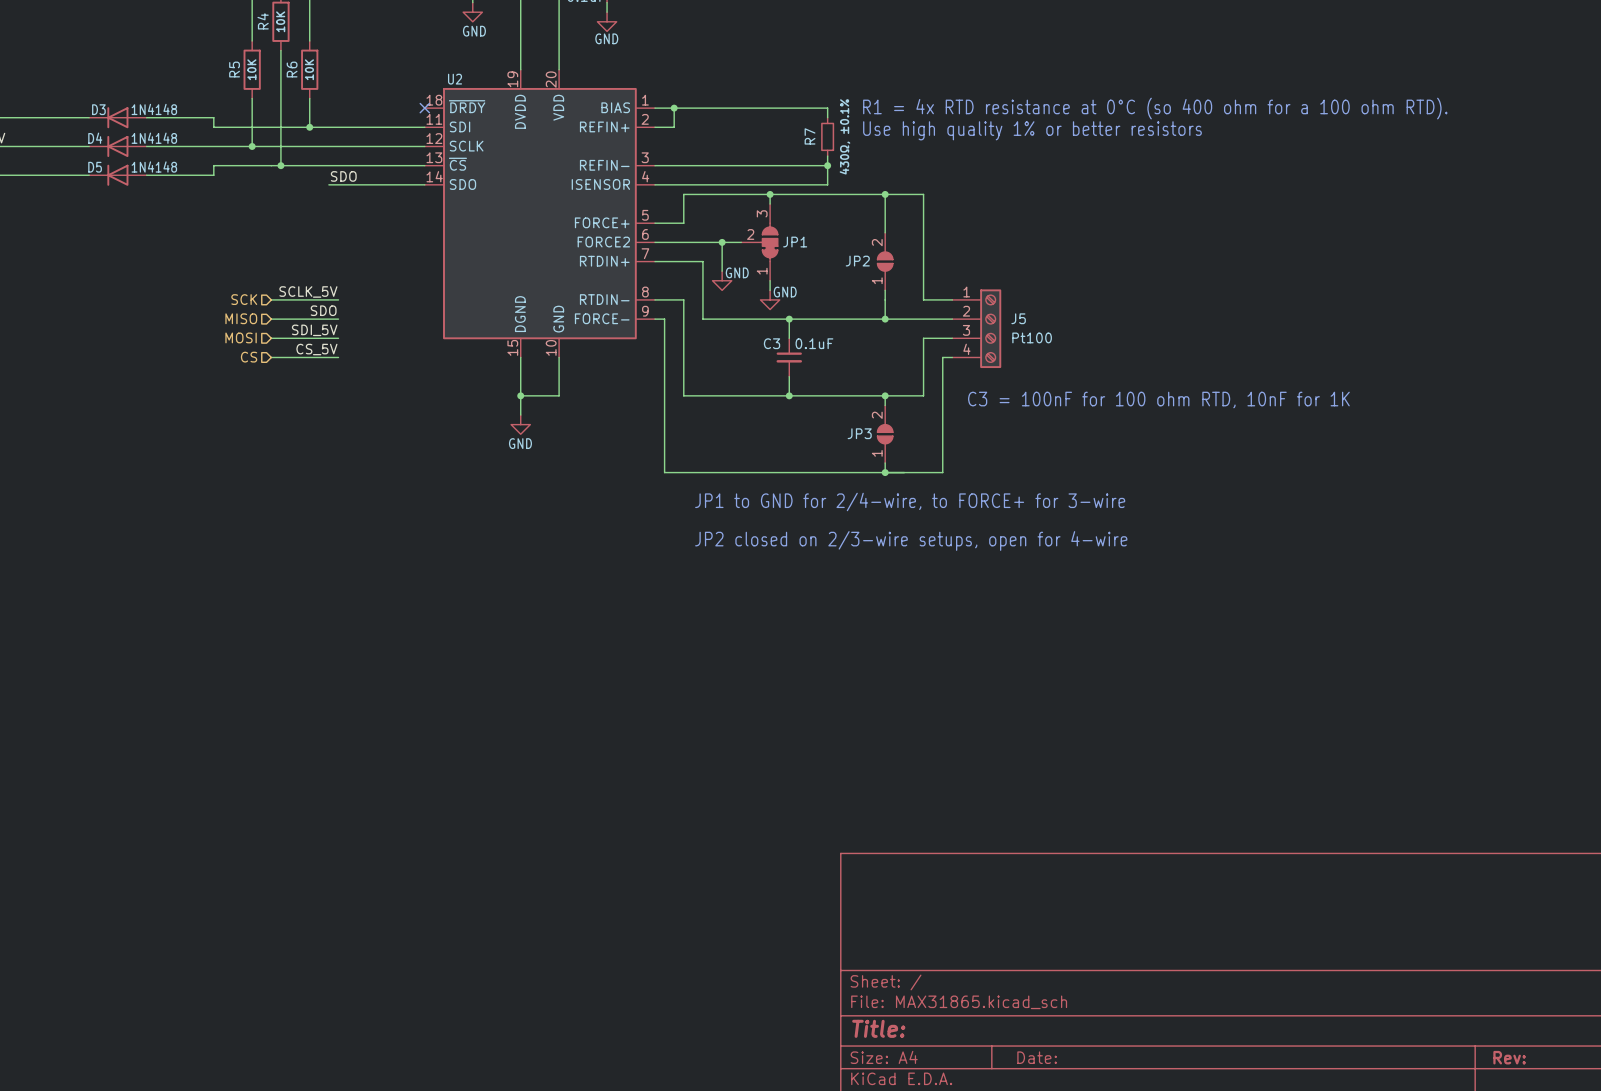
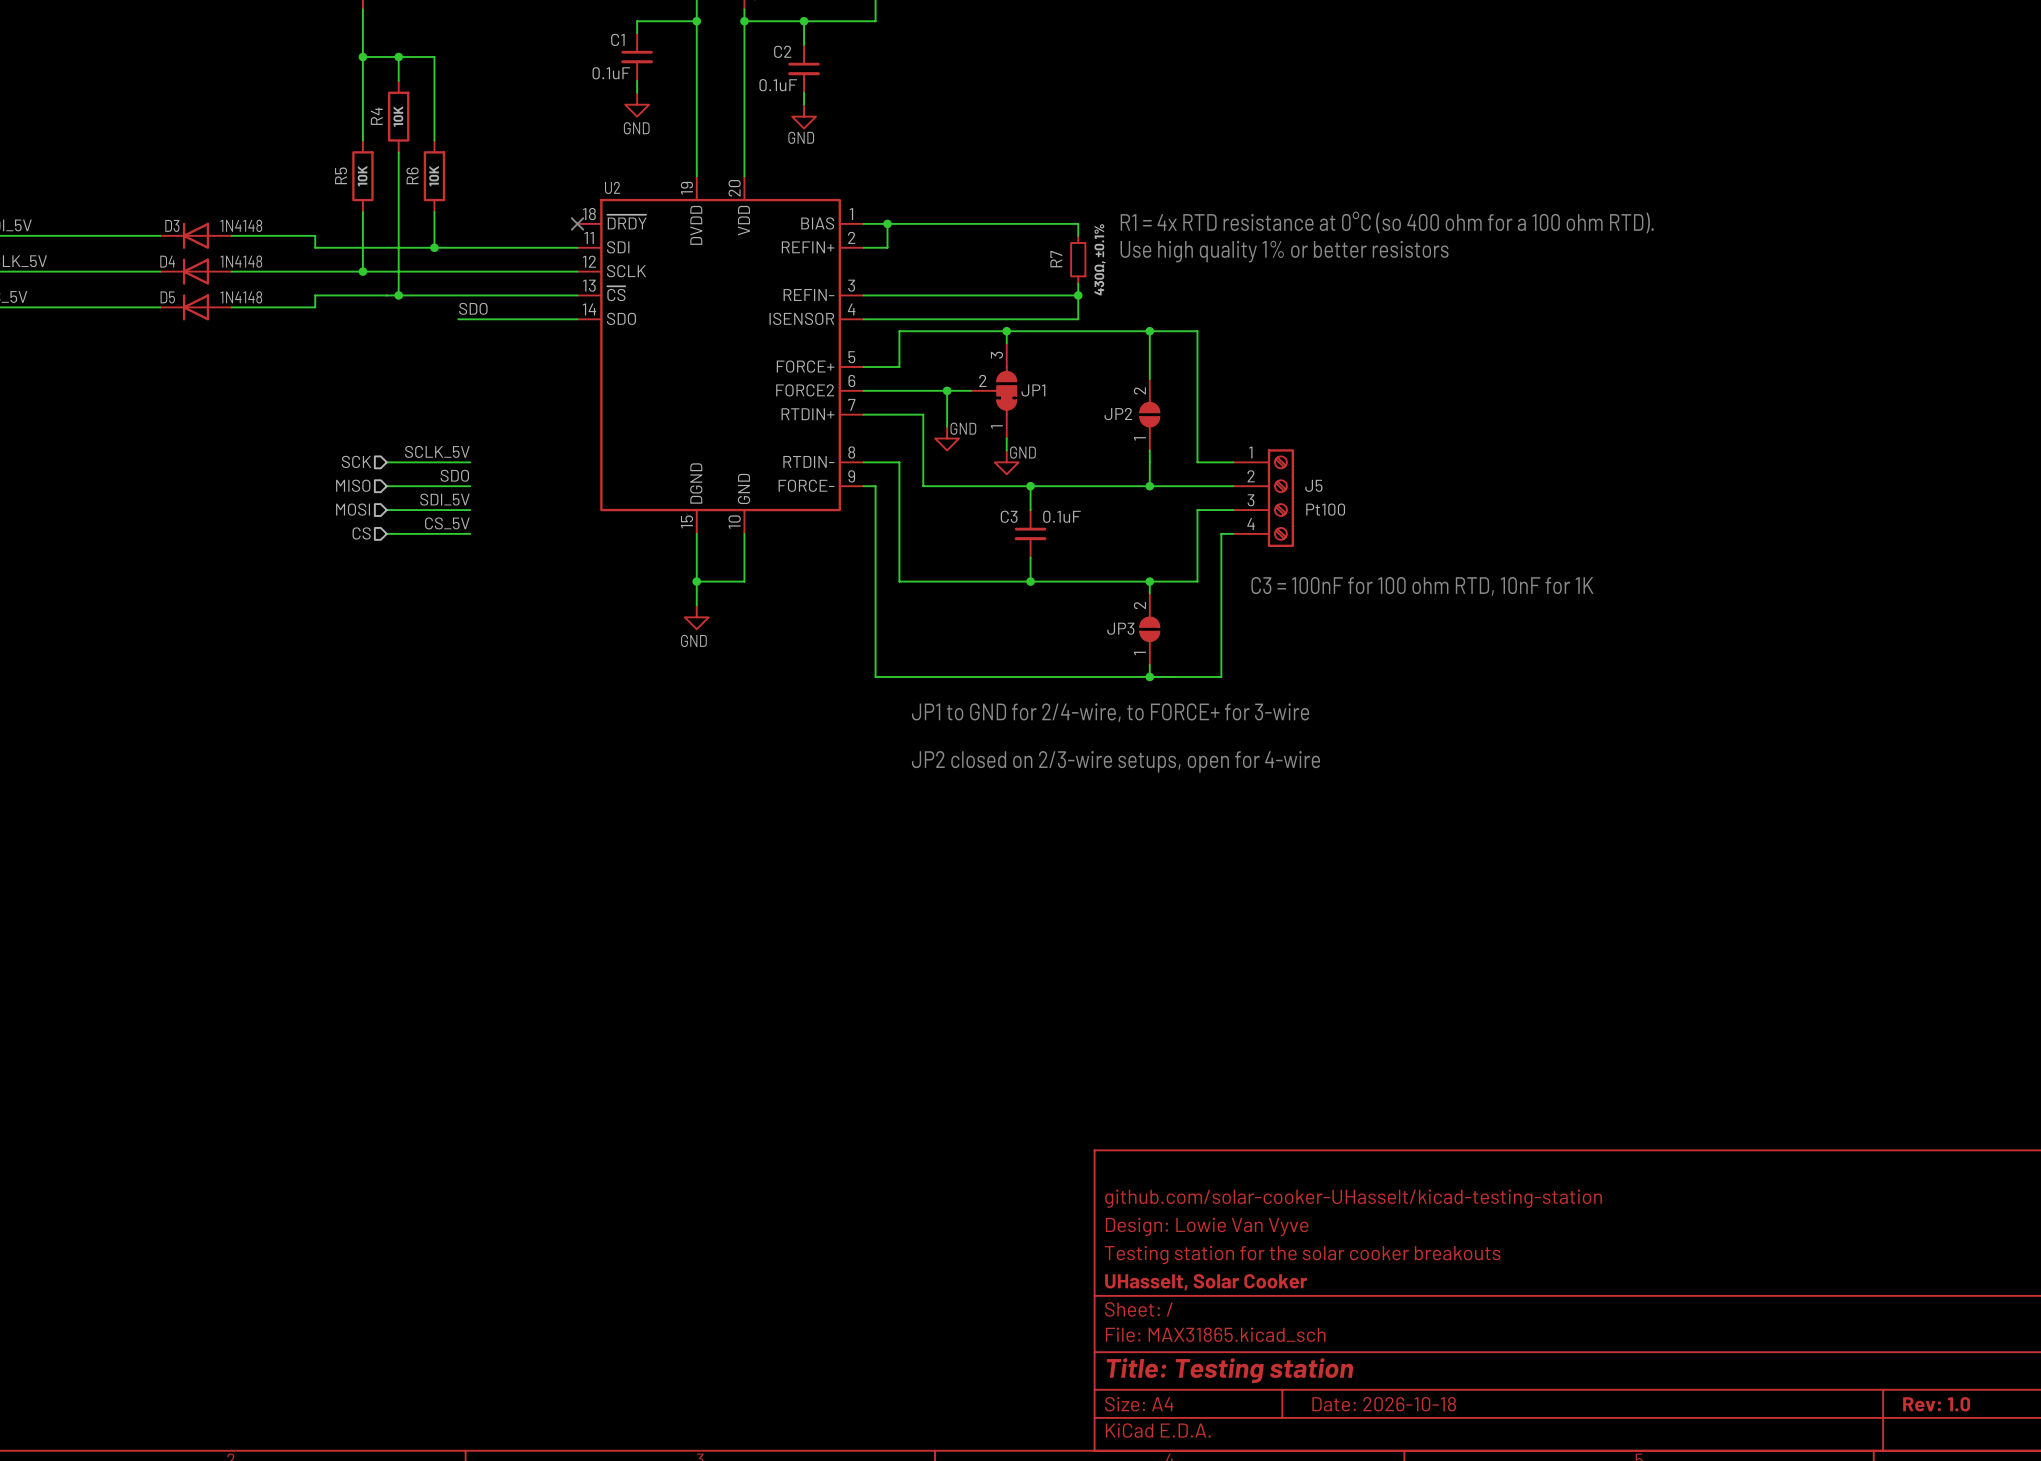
title block: none -> github.com/solar-cooker-UHasselt/kicad-testing-station (1353, 1198)
title block: none -> Design: Lowie Van Vyve (1207, 1226)
title block: none -> Testing station for the solar cooker breakouts (1302, 1255)
title block: none -> UHasselt, Solar Cooker (1206, 1282)
title block: Title: (878, 1028) -> Title: Testing station (1230, 1370)
title block: Date: (1037, 1057) -> Date: 2026-10-18 (1384, 1404)
title block: Rev: (1509, 1057) -> Rev: 1.0 (1936, 1404)

